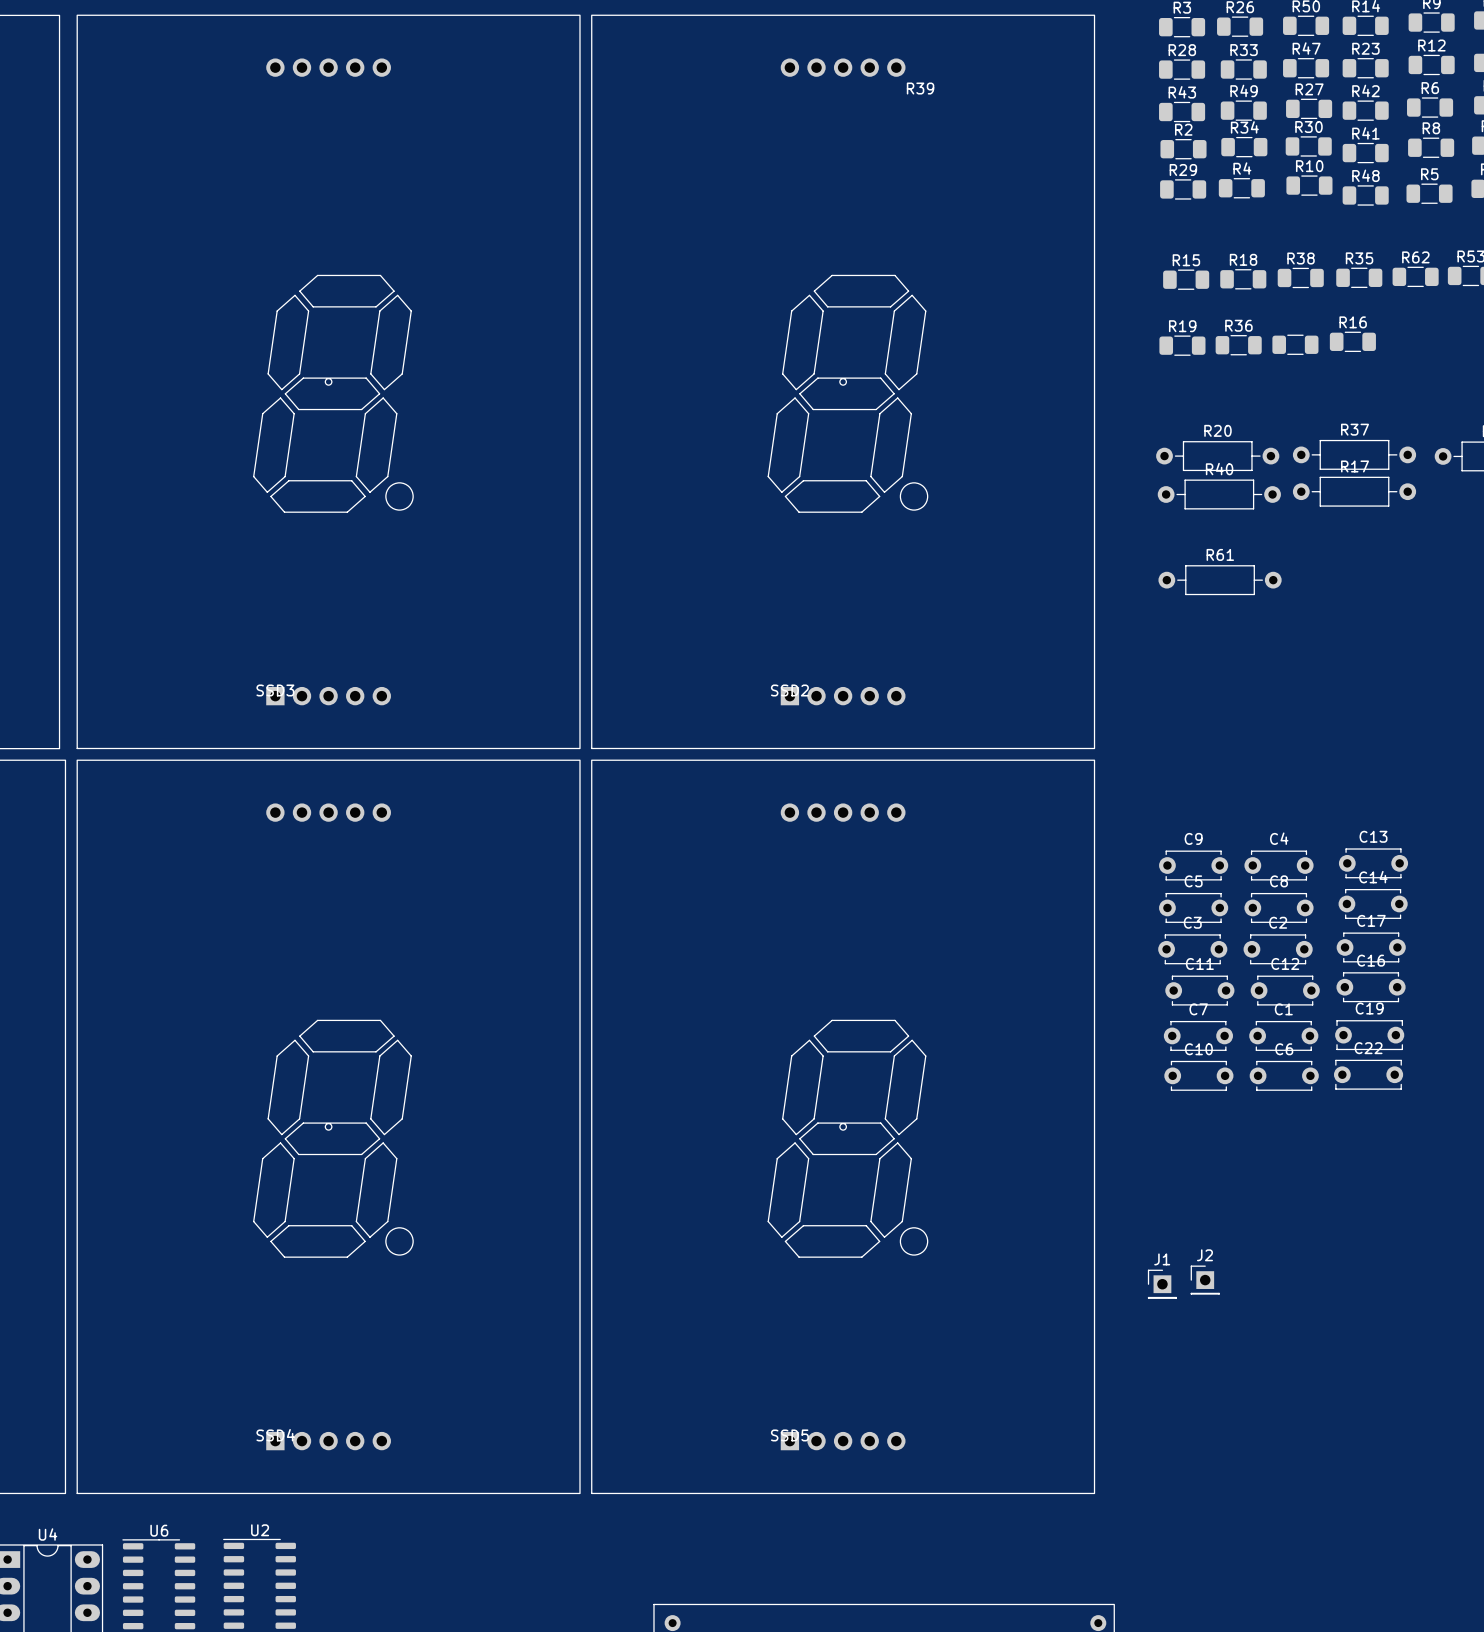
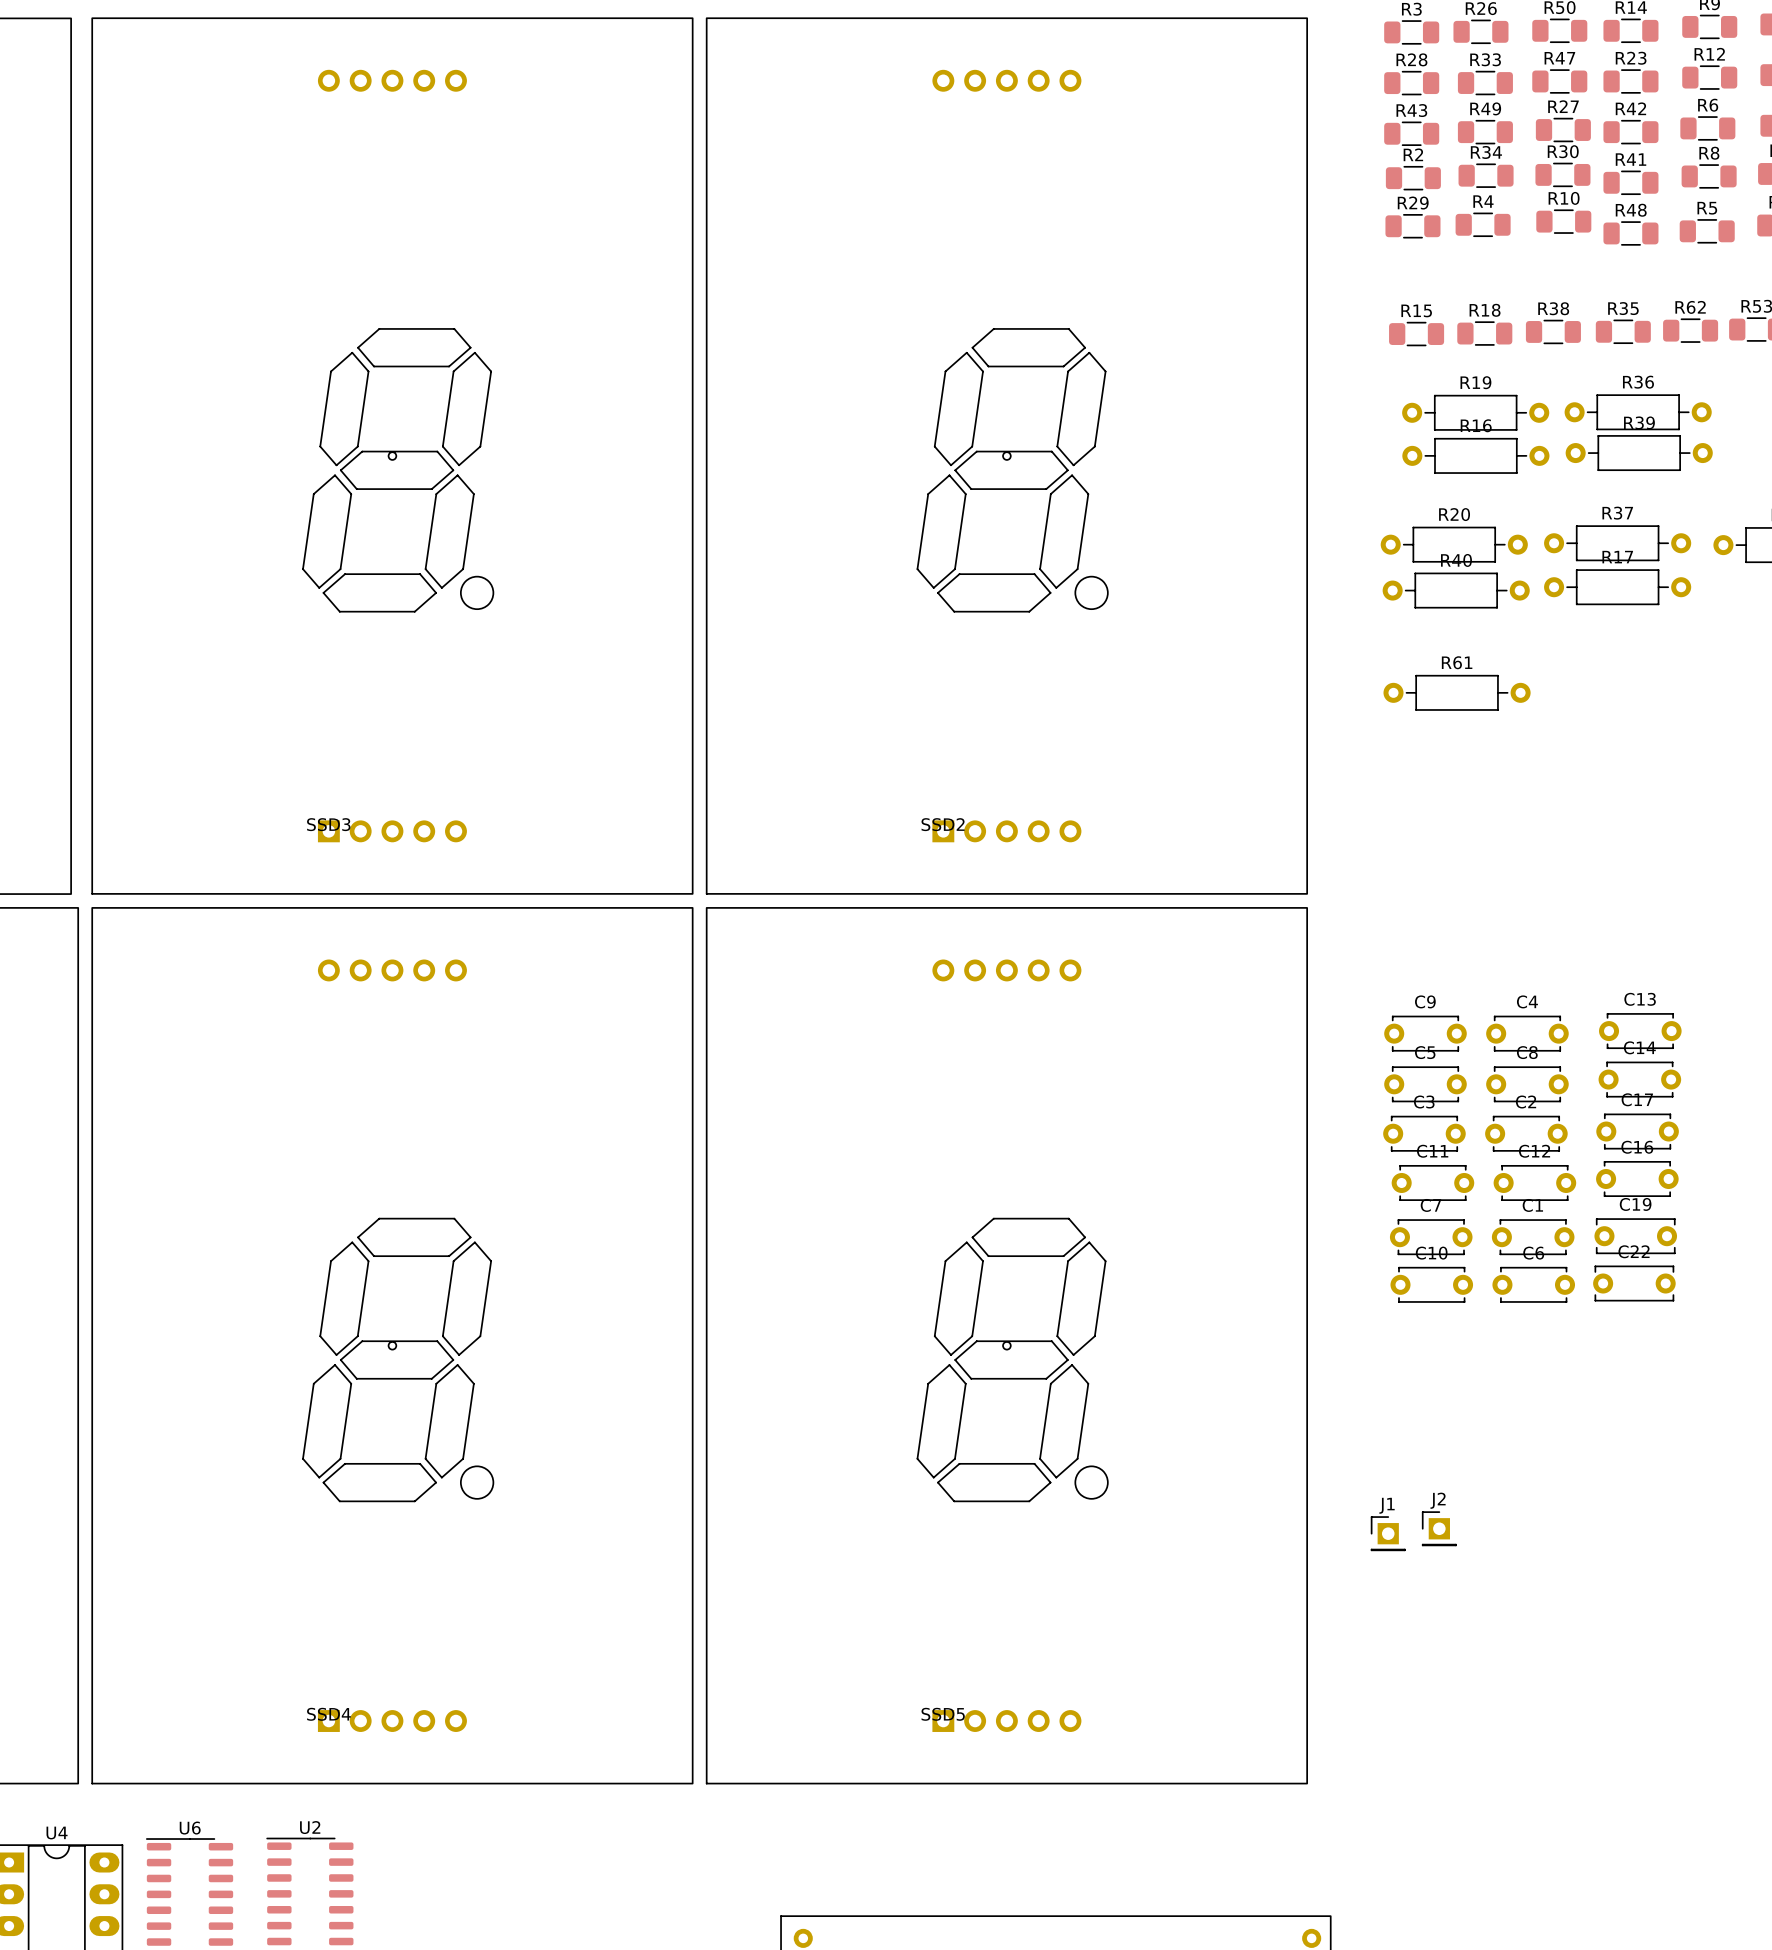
R39 name position: R39 (920, 88) -> R39 (1639, 422)
R16 footprint: [1329, 331, 1376, 352] -> [1402, 437, 1550, 474]
R39 footprint: [1272, 334, 1319, 355] -> [1565, 435, 1713, 471]
R19 footprint: [1159, 335, 1206, 356] -> [1402, 394, 1550, 431]
R36 footprint: [1215, 335, 1262, 356] -> [1564, 394, 1712, 431]

